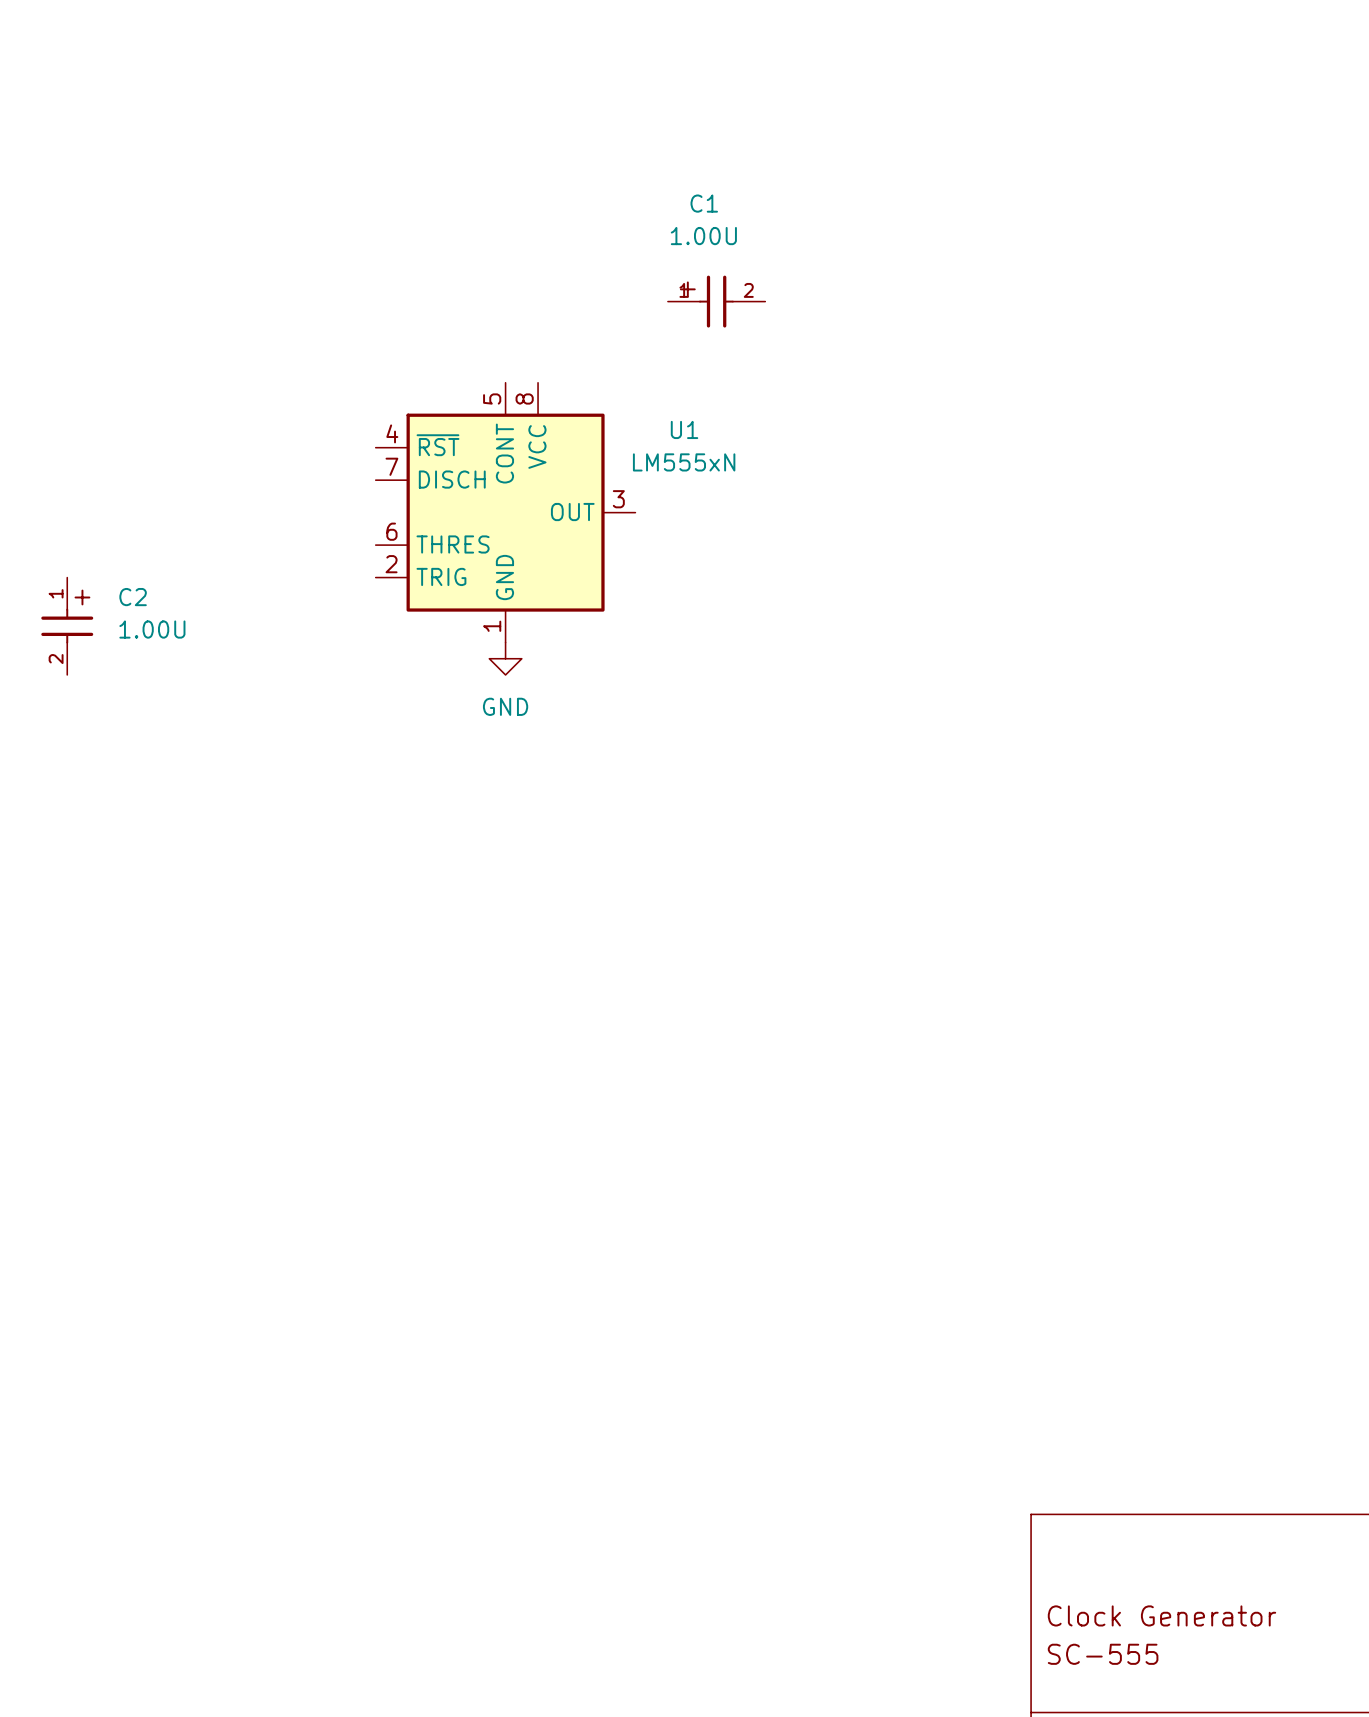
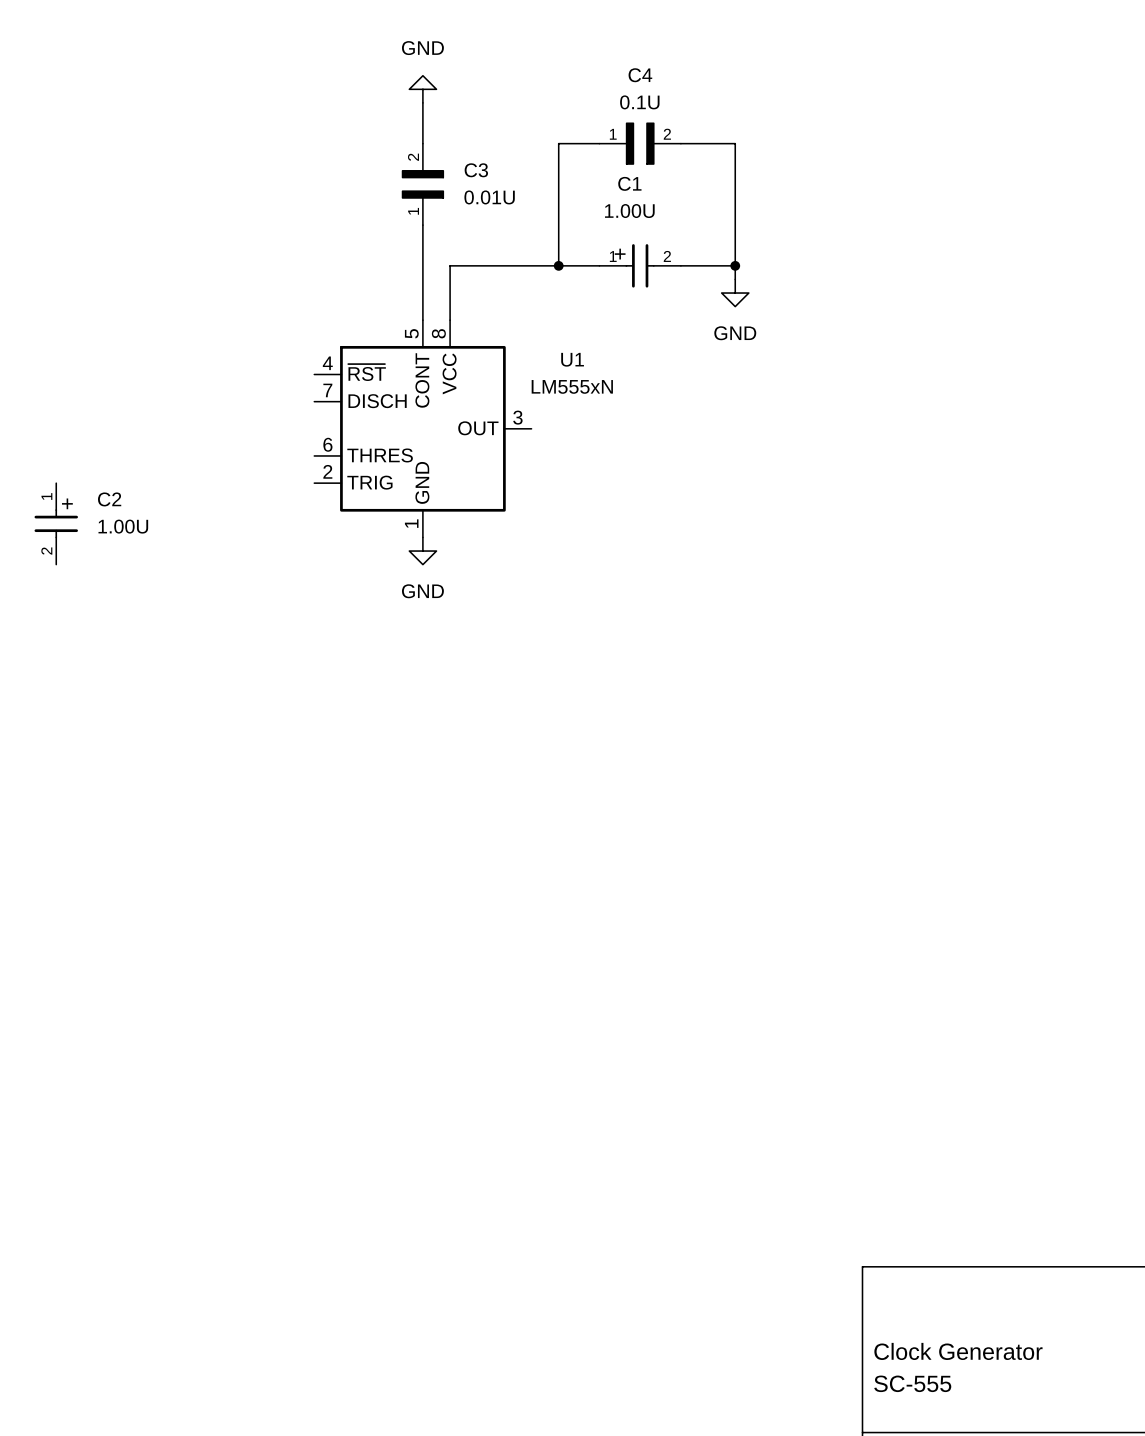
power symbol: none -> GND (422, 89)
wire: none -> (422, 102) (422, 143)
wire: none -> (599, 143) (558, 143) (558, 265)
C4: none -> 0.1U (640, 143)
wire: none -> (680, 143) (735, 143) (735, 279)
C3: none -> 0.01U (422, 184)
wire: none -> (422, 225) (422, 320)
C1 position: (716, 301) -> (640, 265)
junction: none -> (558, 265)
wire: none -> (599, 265) (450, 265) (450, 320)
wire: none -> (680, 265) (735, 265)
junction: none -> (735, 265)
power symbol: none -> GND (735, 293)

